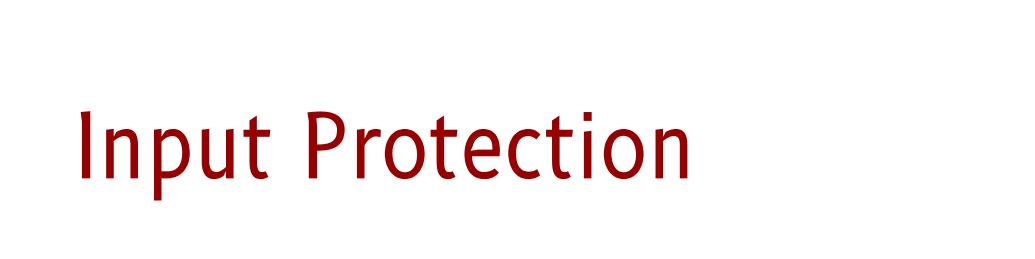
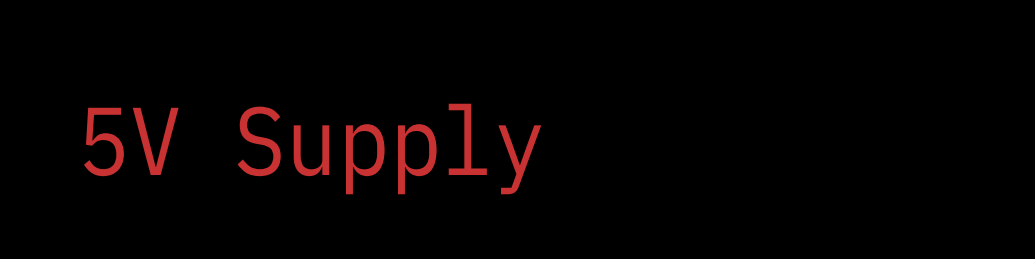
text: Input Protection (384, 155) -> 5V Supply (312, 149)

